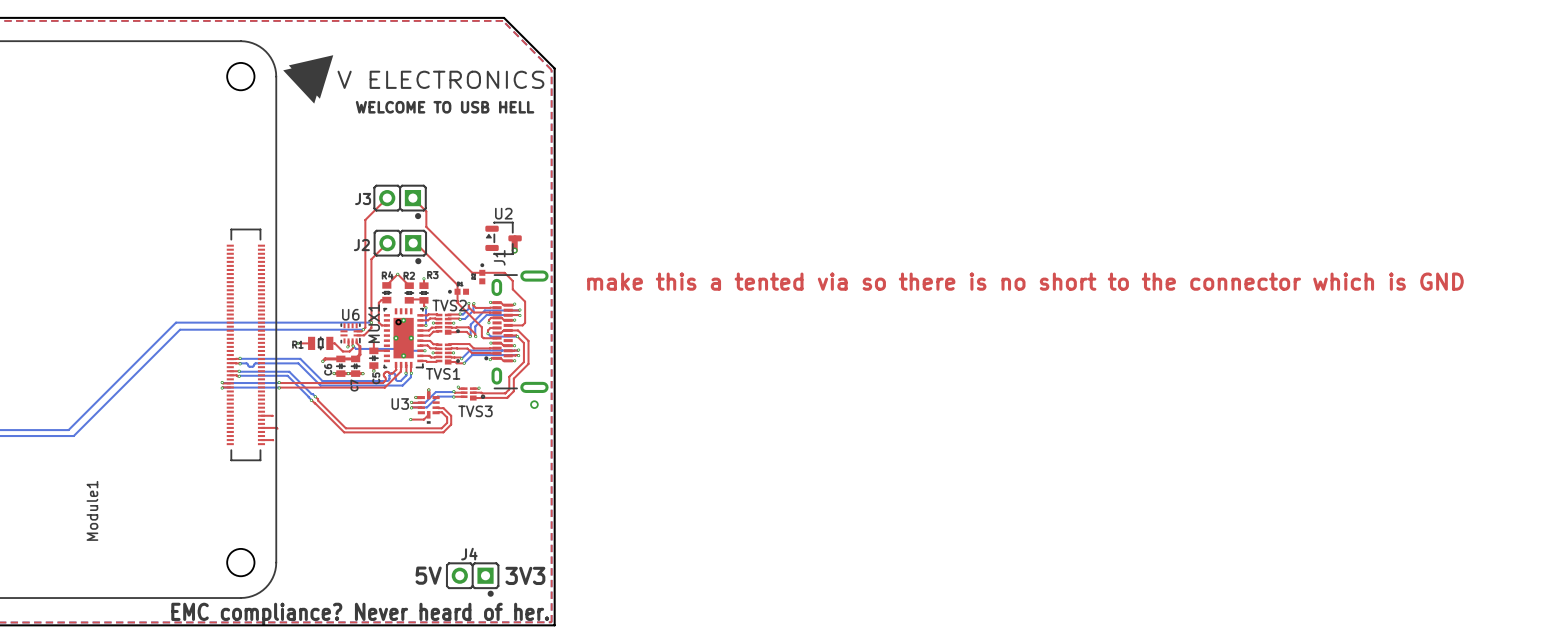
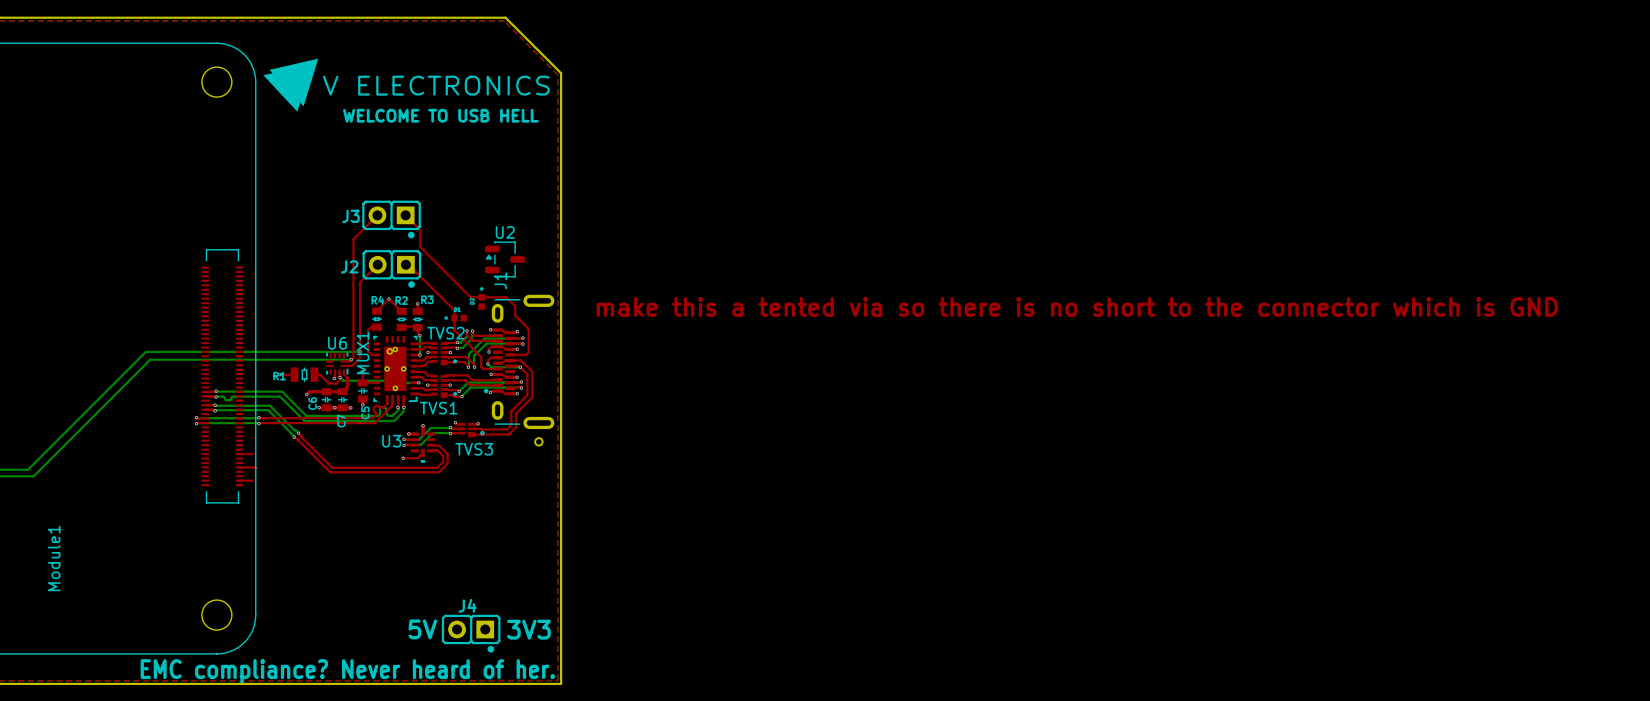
top track: (515, 238) (514, 250) -> none
via: (514, 250) -> none

